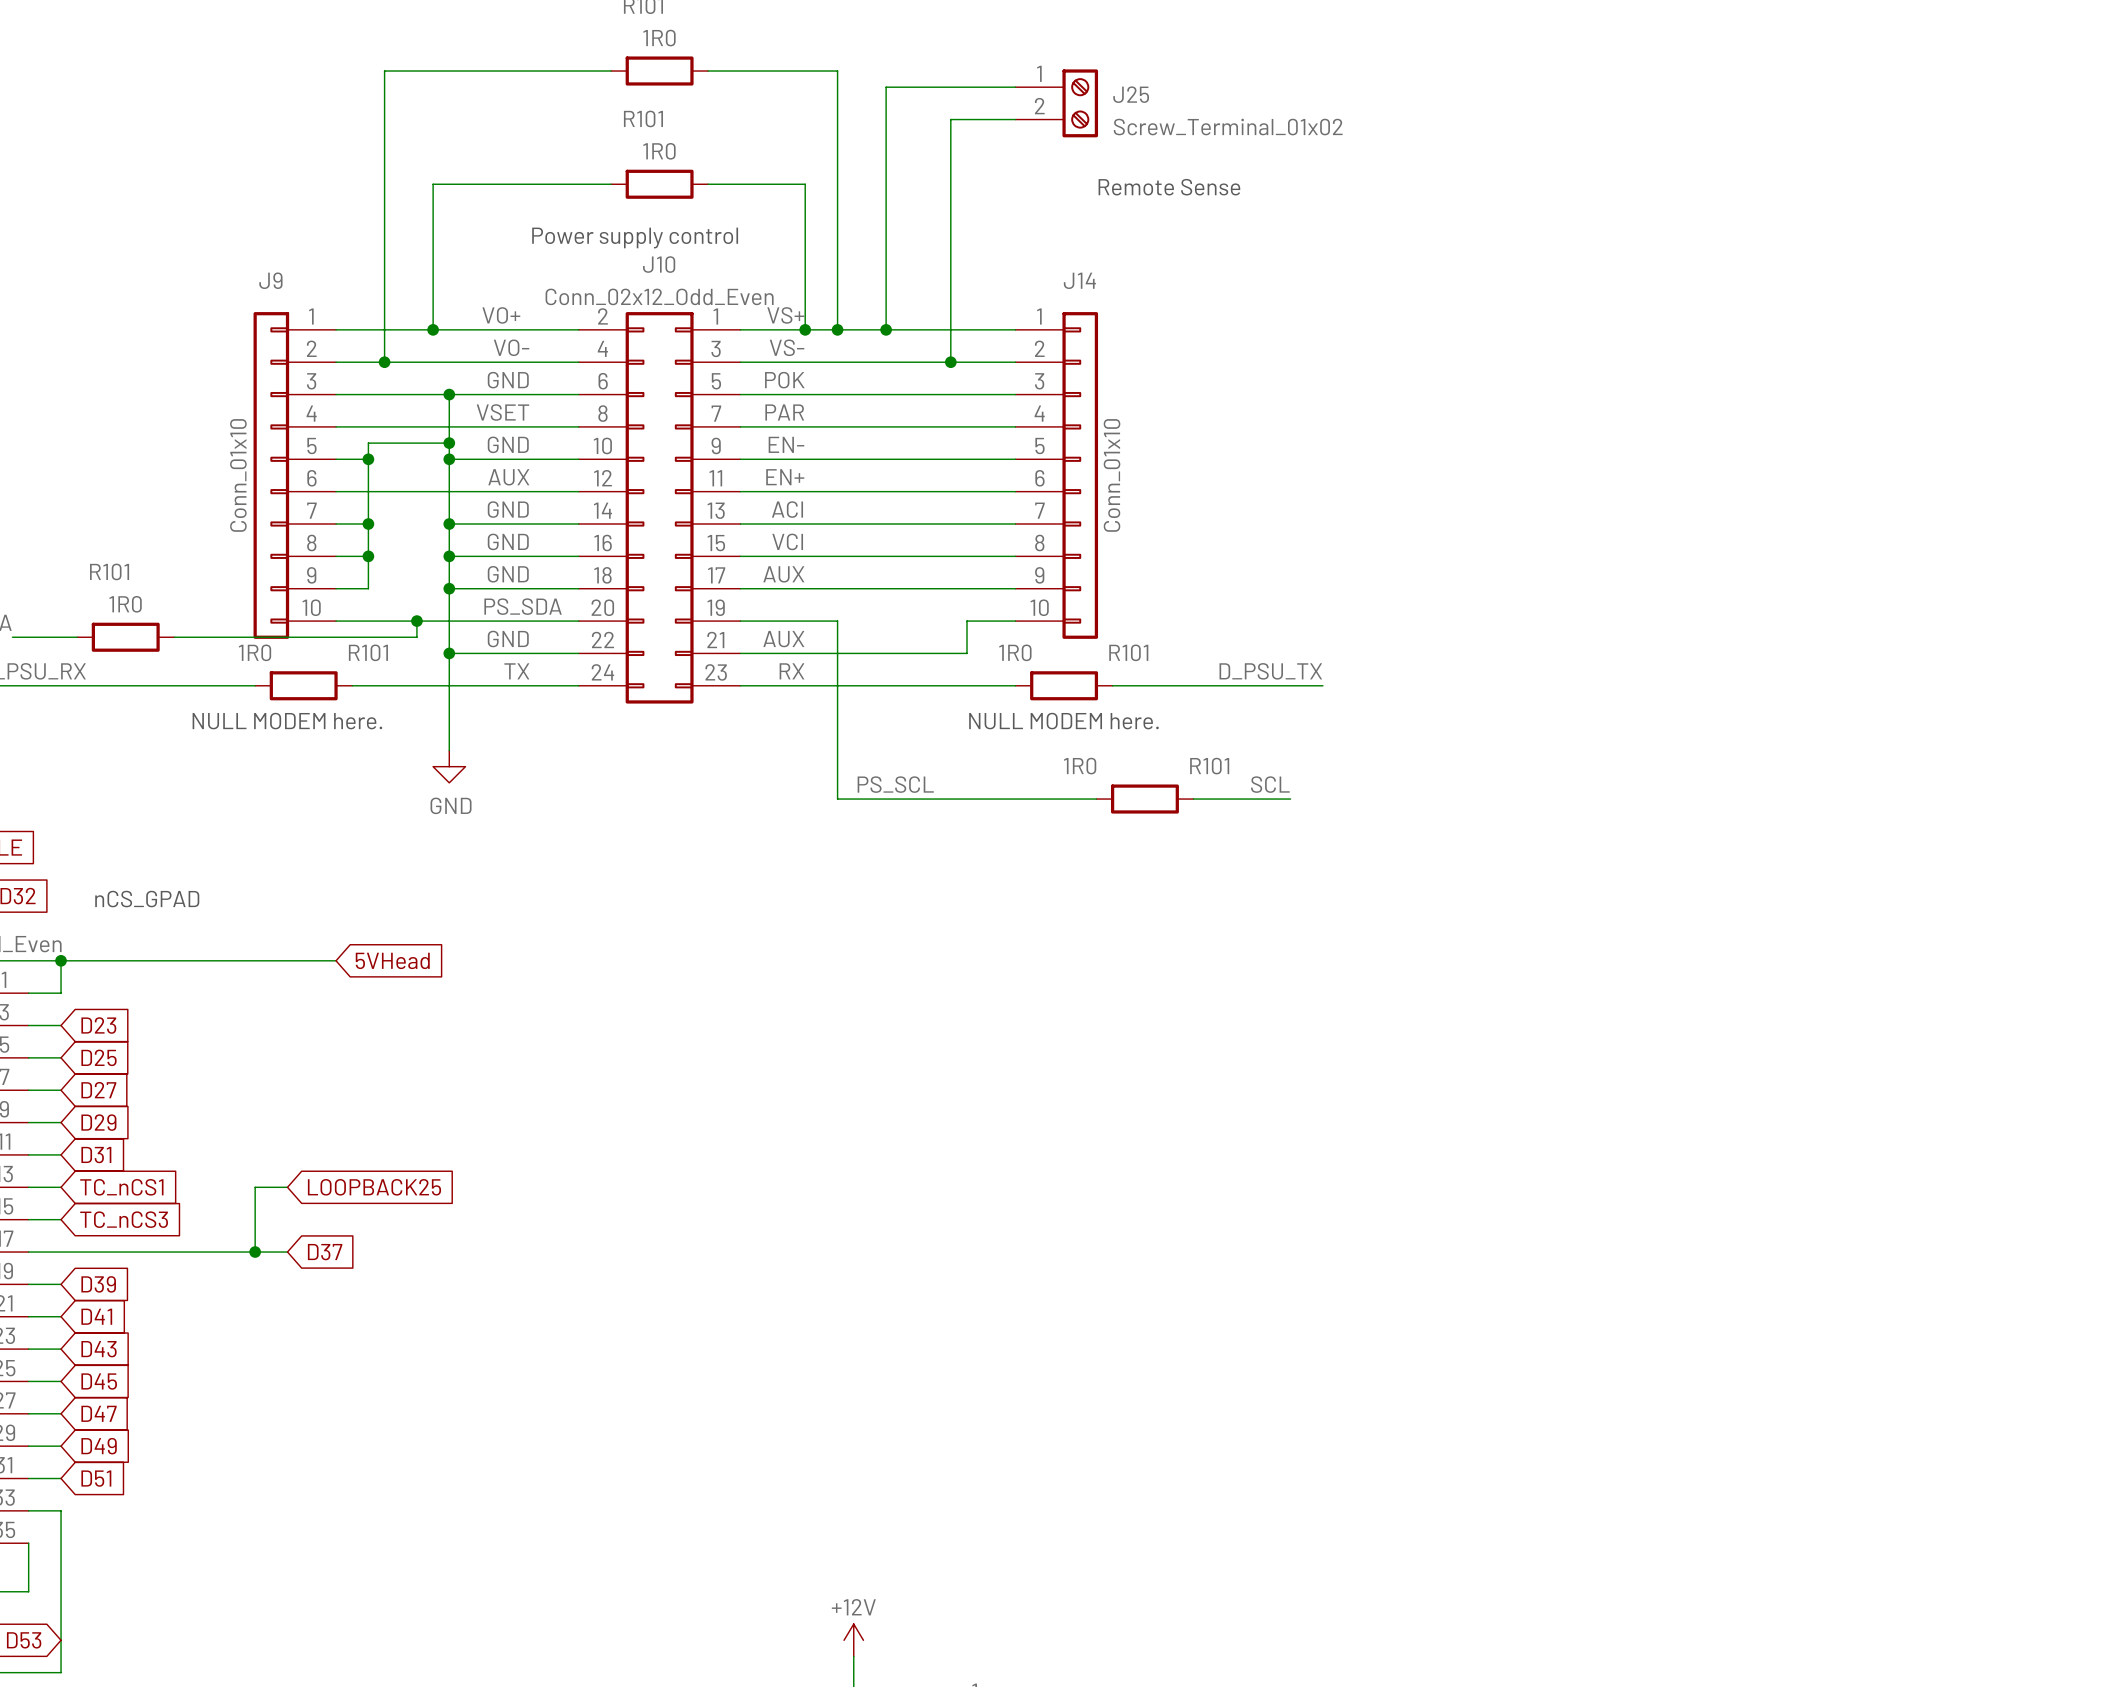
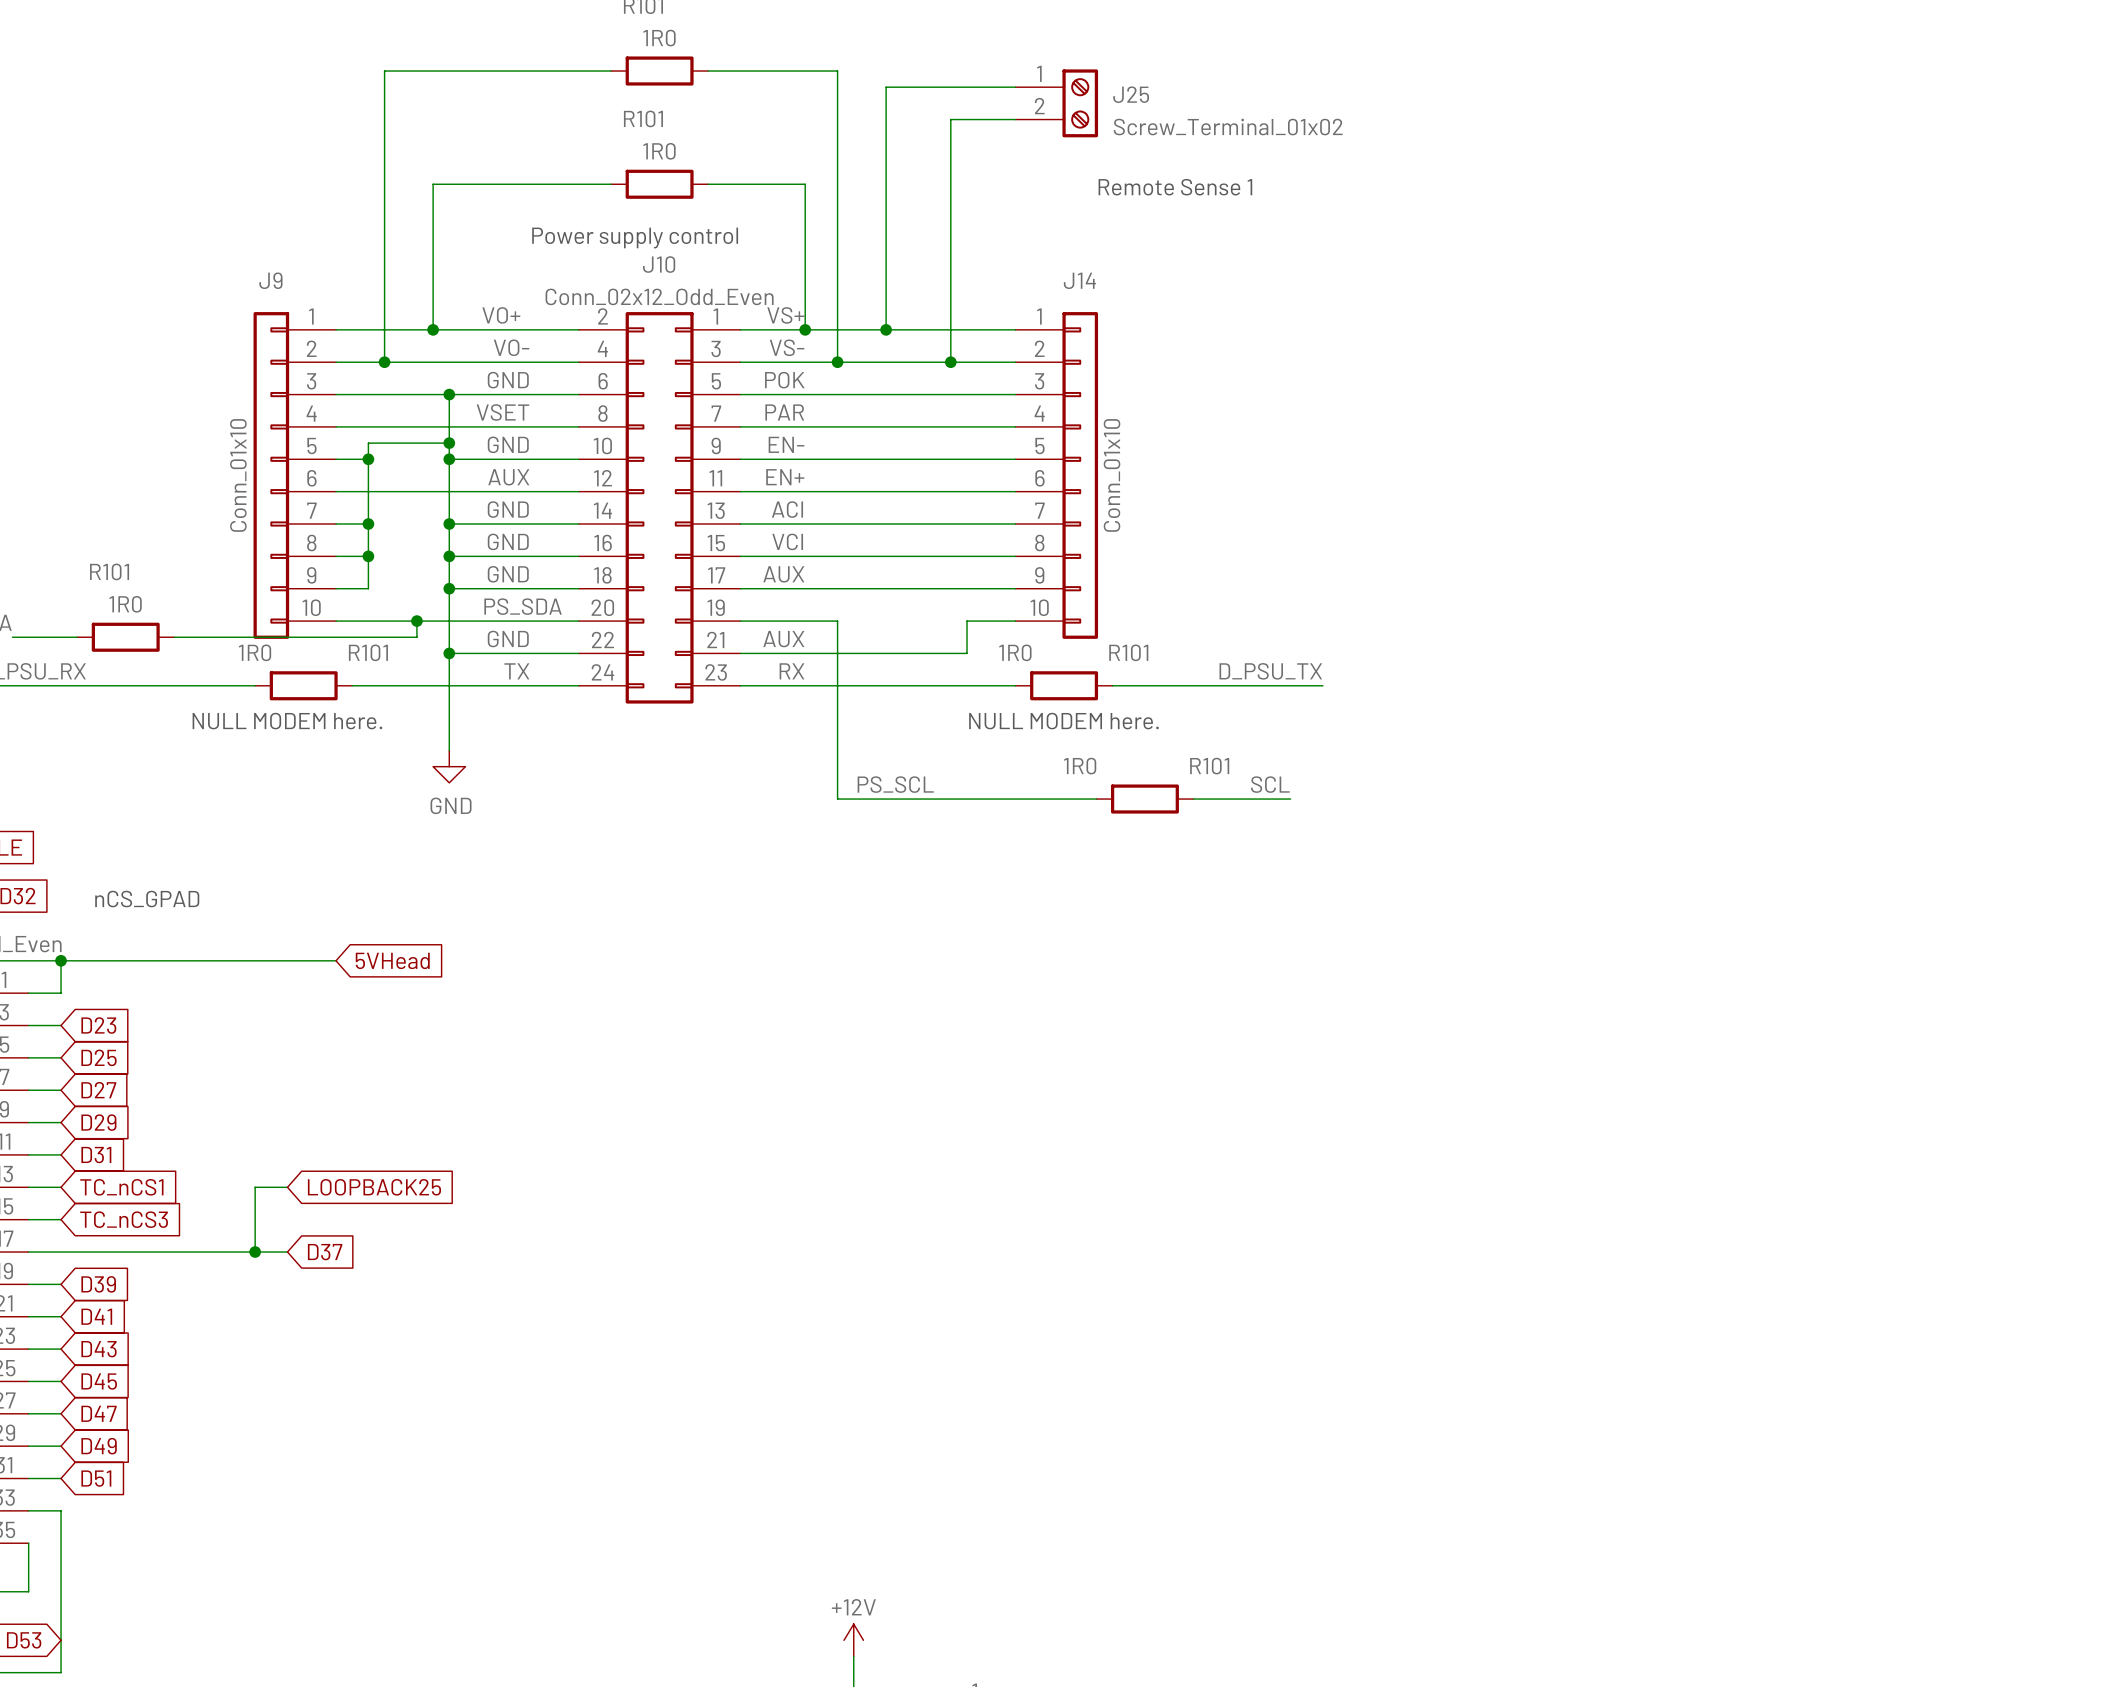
text: Remote Sense (1169, 187) -> Remote Sense 1 (1175, 187)
wire: none -> (837, 329) (837, 362)
junction position: (837, 329) -> (837, 362)

